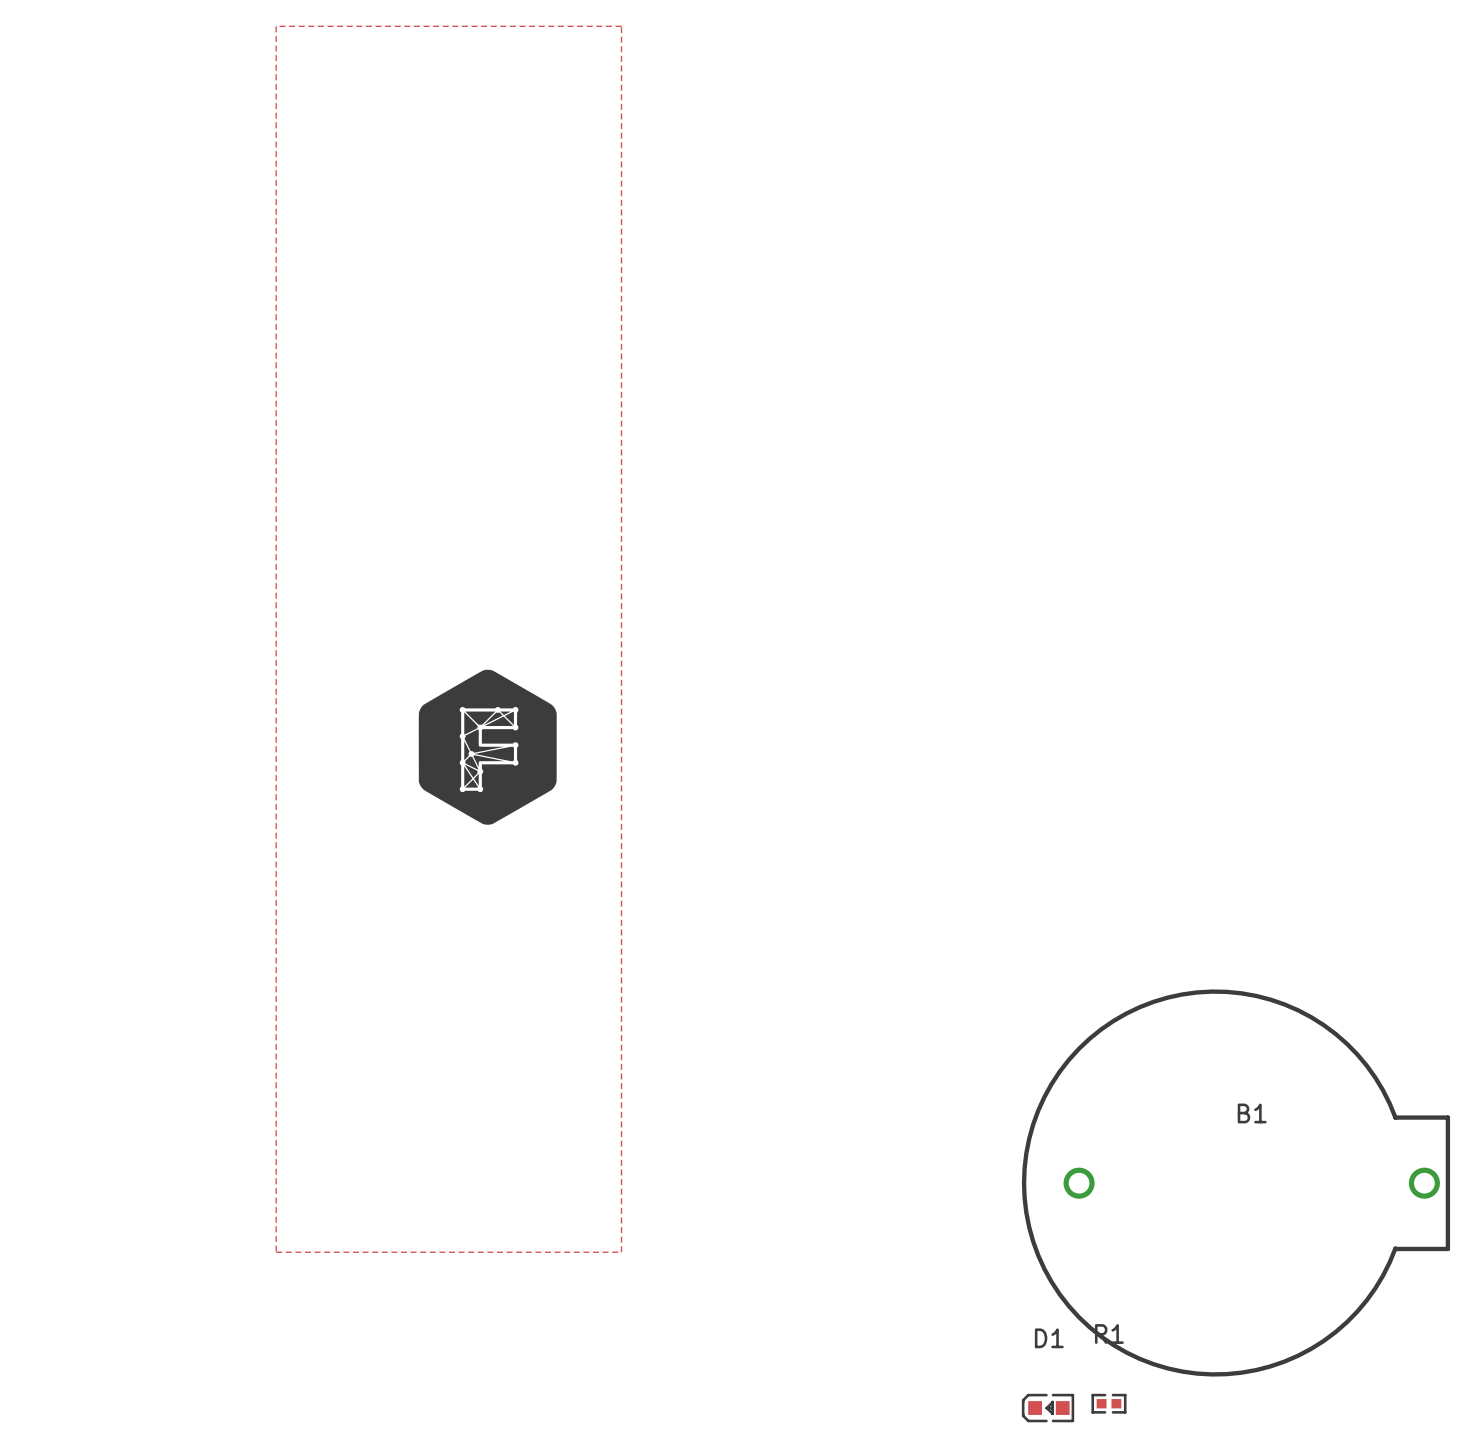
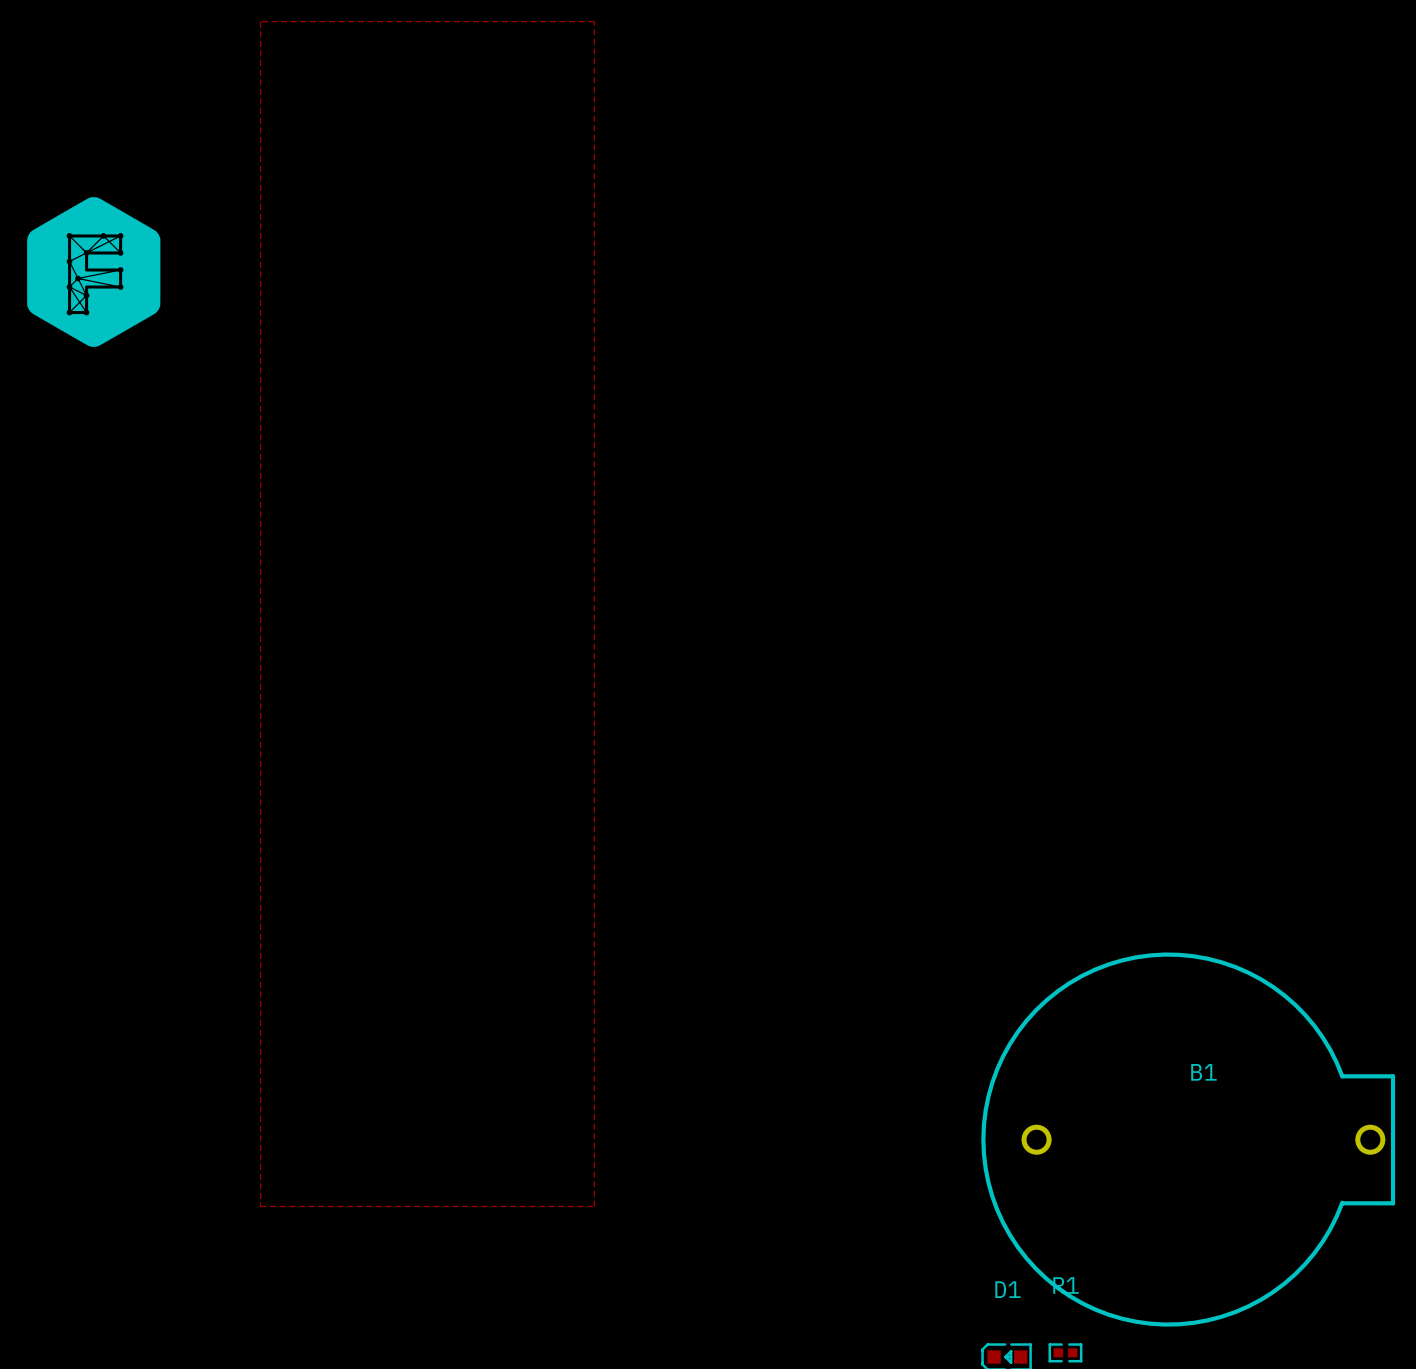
drawing: none -> [27, 197, 161, 347]
drawing: [418, 669, 557, 825] -> none

